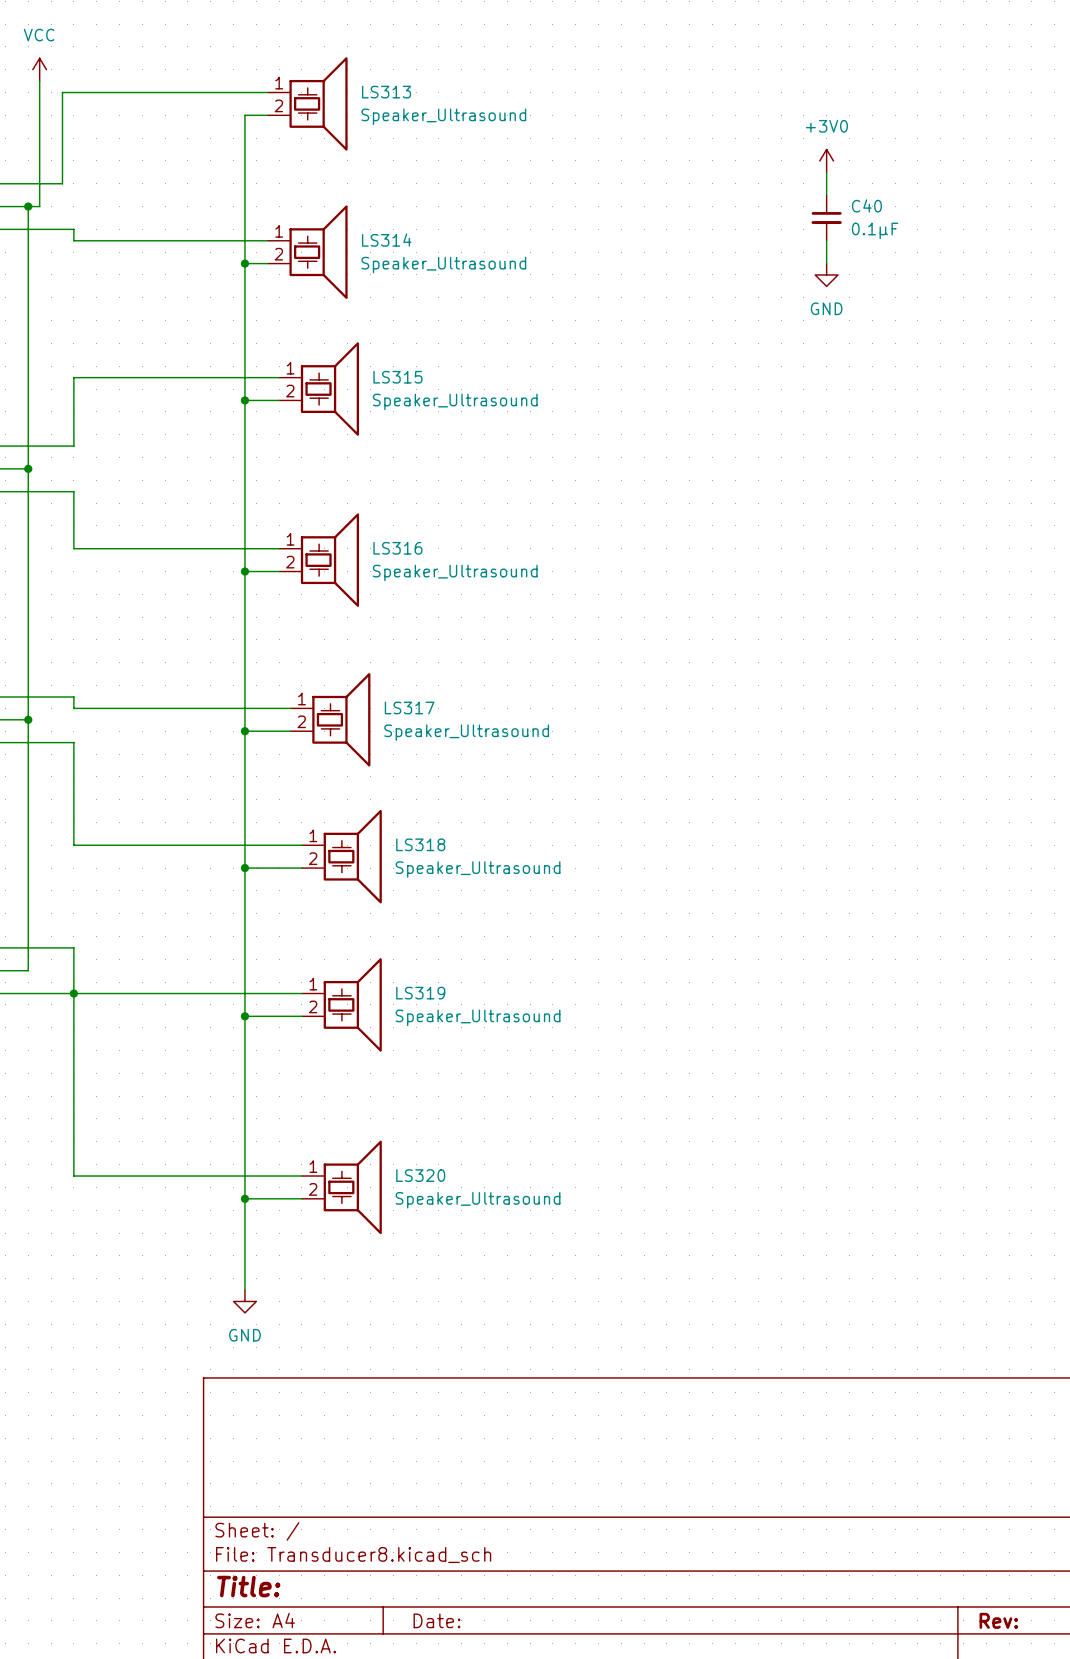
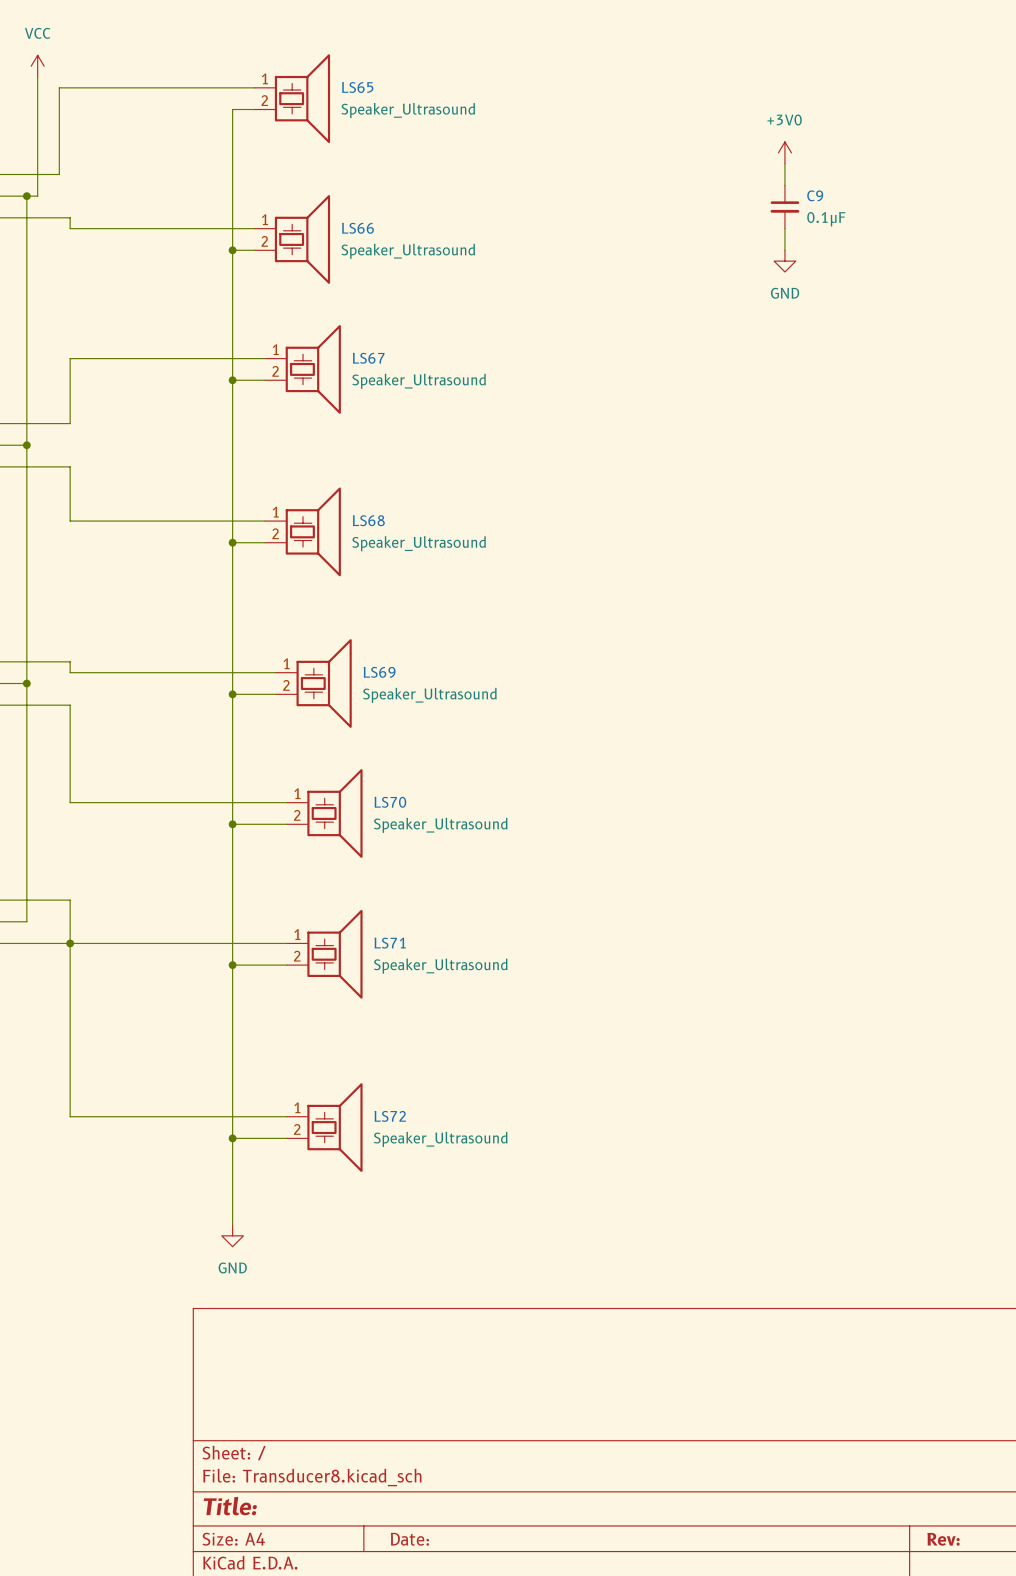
LS313 name: LS313 (386, 92) -> LS65 (357, 87)
C40 name: C40 (866, 205) -> C9 (815, 195)
LS314 name: LS314 (386, 240) -> LS66 (357, 228)
LS315 name: LS315 (397, 377) -> LS67 (368, 358)
LS316 name: LS316 (397, 548) -> LS68 (368, 520)
LS317 name: LS317 (409, 707) -> LS69 (379, 672)
LS318 name: LS318 (420, 844) -> LS70 (390, 802)
LS319 name: LS319 (420, 993) -> LS71 (390, 943)
LS320 name: LS320 (420, 1175) -> LS72 (390, 1116)

